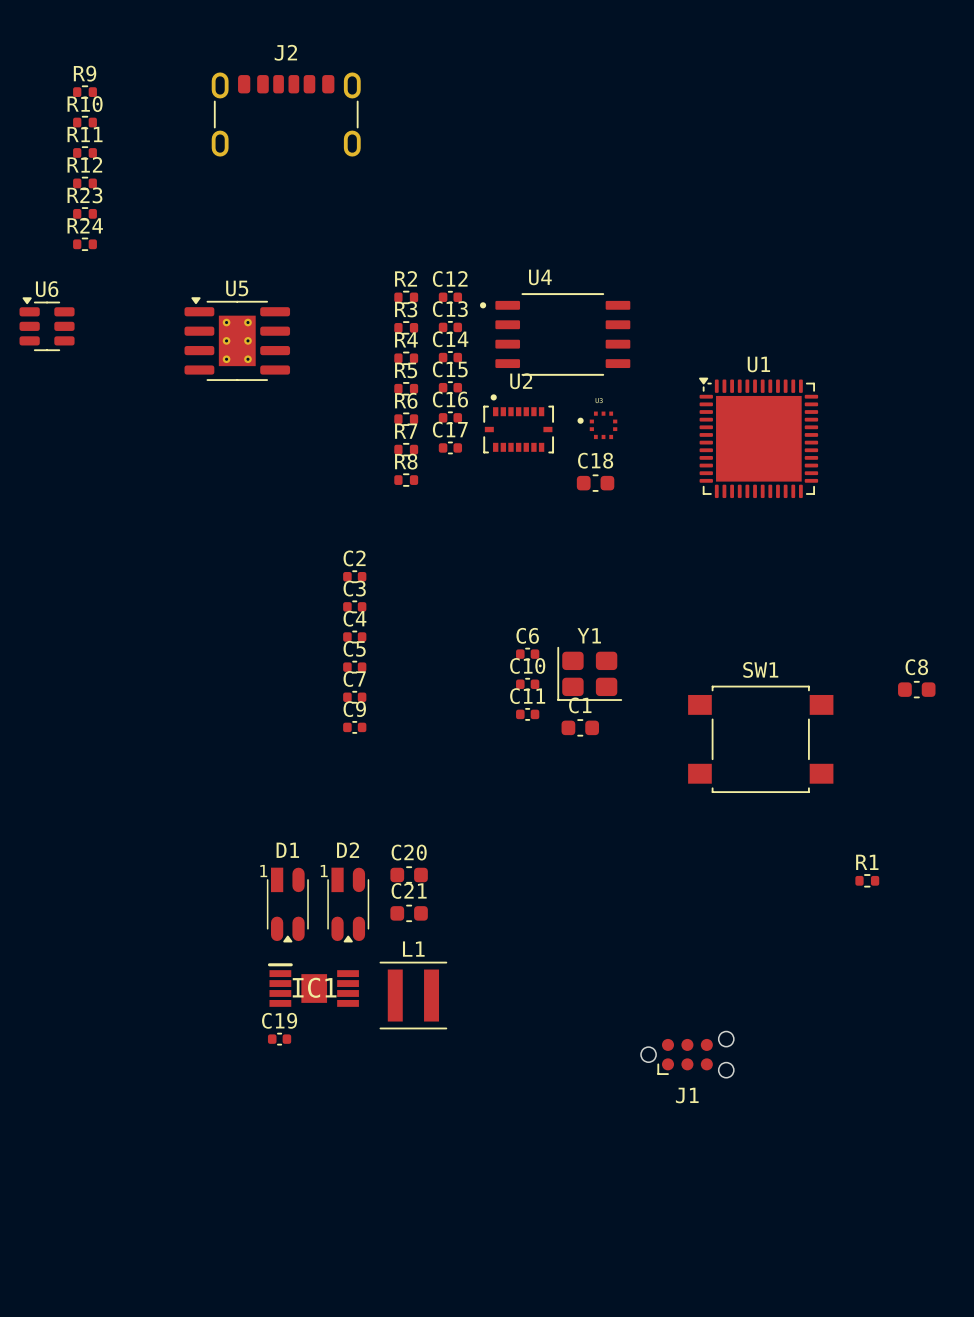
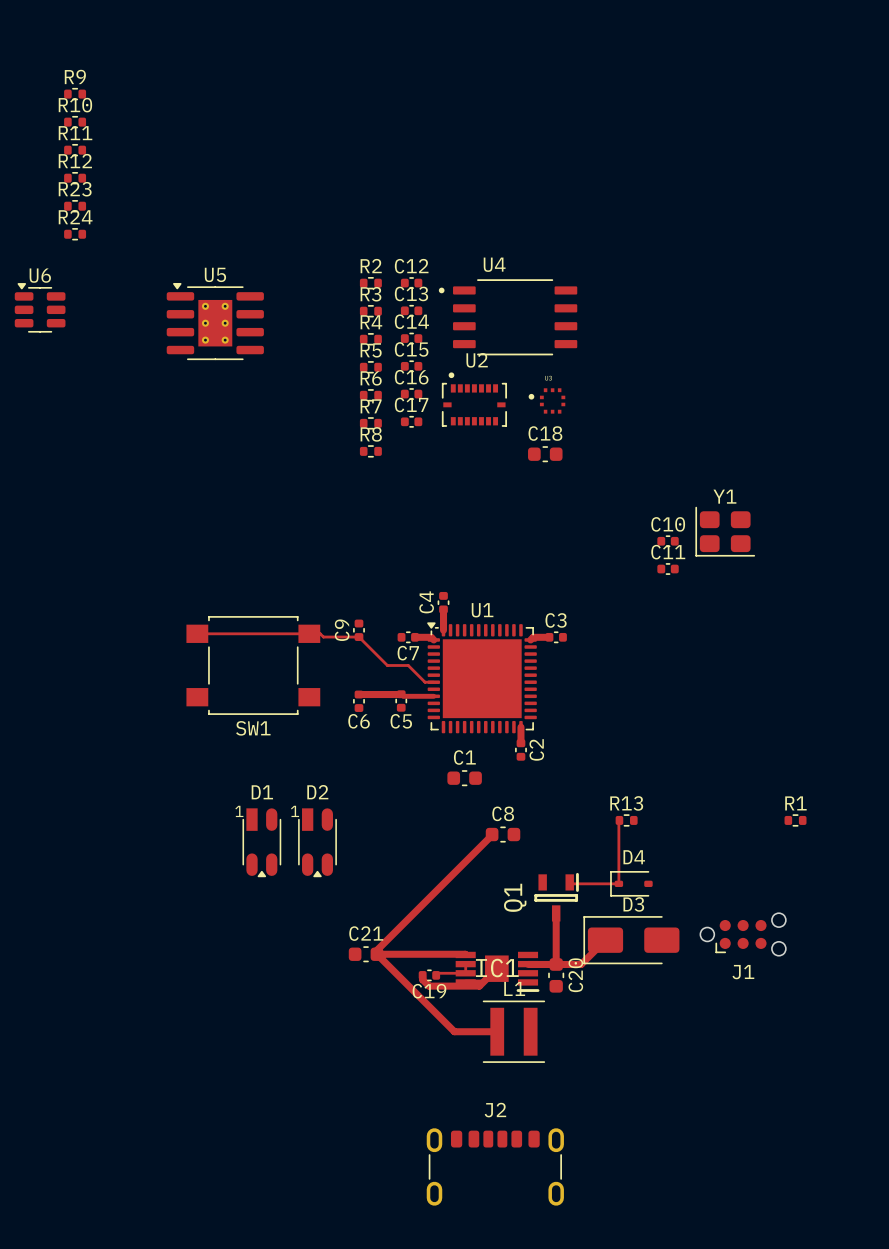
J2 position: (286, 114) -> (495, 1166)
U1 position: (758, 437) -> (481, 677)
C2 rotation: 0° (354, 576) -> 90° clockwise (520, 750)
C2 position: (354, 576) -> (520, 750)
C3 position: (354, 606) -> (556, 637)
C4 rotation: 0° (354, 637) -> 90° clockwise (443, 602)
C4 position: (354, 637) -> (443, 602)
track: none -> (443, 609) (443, 630)
C6 rotation: 0° (527, 654) -> 90° clockwise (358, 701)
C6 position: (527, 654) -> (358, 701)
C5 rotation: 0° (354, 667) -> 90° clockwise (401, 700)
C5 position: (354, 667) -> (401, 700)
SW1 name position: SW1 (760, 669) -> SW1 (253, 728)
Y1 position: (589, 673) -> (725, 531)
track: none -> (197, 633) (320, 633) (323, 637) (358, 637)
C7 name position: C7 (354, 678) -> C7 (408, 653)
track: none -> (358, 637) (387, 665) (408, 665) (425, 682) (433, 682)
track: none -> (415, 637) (431, 637) (433, 639)
track: none -> (549, 637) (533, 637) (530, 639)
C10 position: (527, 684) -> (668, 541)
C8 position: (916, 689) -> (503, 834)
C7 position: (354, 697) -> (408, 637)
C11 position: (527, 714) -> (668, 569)
C9 rotation: 0° (354, 727) -> 90° clockwise (358, 630)
C9 position: (354, 727) -> (358, 630)
C1 position: (580, 727) -> (464, 778)
SW1 position: (760, 739) -> (253, 665)
track: none -> (358, 694) (400, 694)
track: none -> (403, 696) (433, 696)
track: none -> (520, 727) (520, 743)
C20 rotation: 0° (409, 875) -> 90° clockwise (556, 975)
C20 position: (409, 875) -> (556, 975)
track: none -> (619, 820) (618, 883) (569, 882)
R13: none -> (626, 820)
track: none -> (492, 835) (376, 950) (376, 954)
C21 position: (409, 913) -> (366, 954)
D4: none -> (631, 883)
Q1: none -> (556, 897)
track: none -> (556, 913) (556, 964)
IC1 rotation: 0° (313, 985) -> 180° (497, 971)
IC1 position: (313, 985) -> (497, 971)
L1 position: (413, 995) -> (513, 1031)
track: none -> (605, 940) (581, 964) (528, 964)
D3: none -> (631, 940)
C19 name position: C19 (279, 1020) -> C19 (429, 991)
track: none -> (376, 954) (454, 1031) (497, 1031)
track: none -> (376, 954) (465, 954)
track: none -> (464, 965) (465, 973) (438, 973) (436, 975)
C19 position: (279, 1039) -> (429, 975)
track: none -> (422, 975) (422, 979) (429, 986) (479, 986) (496, 968) (483, 982) (465, 982)
J1 position: (687, 1054) -> (743, 934)

